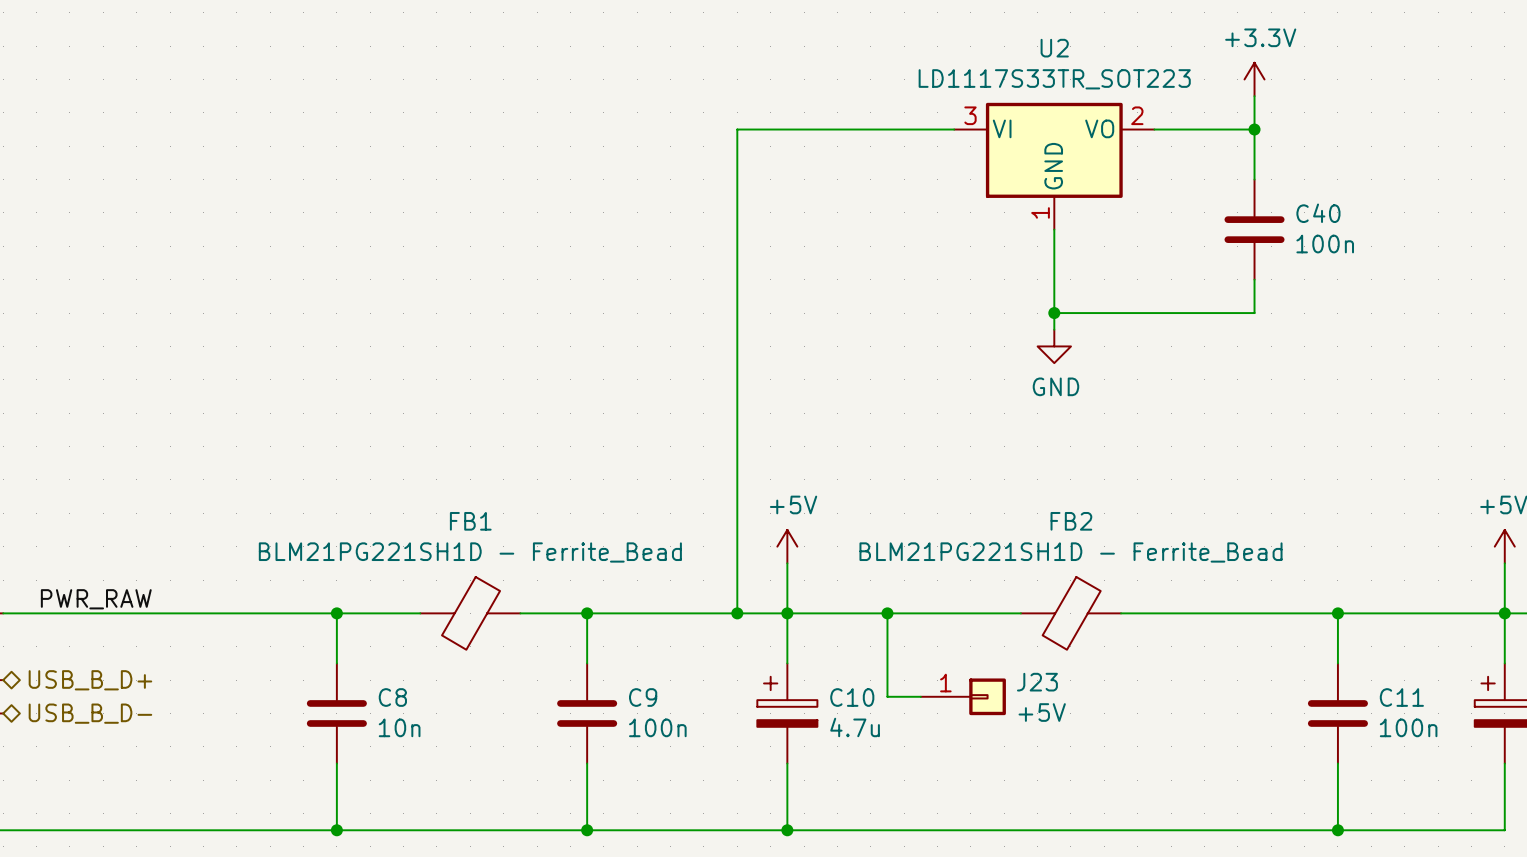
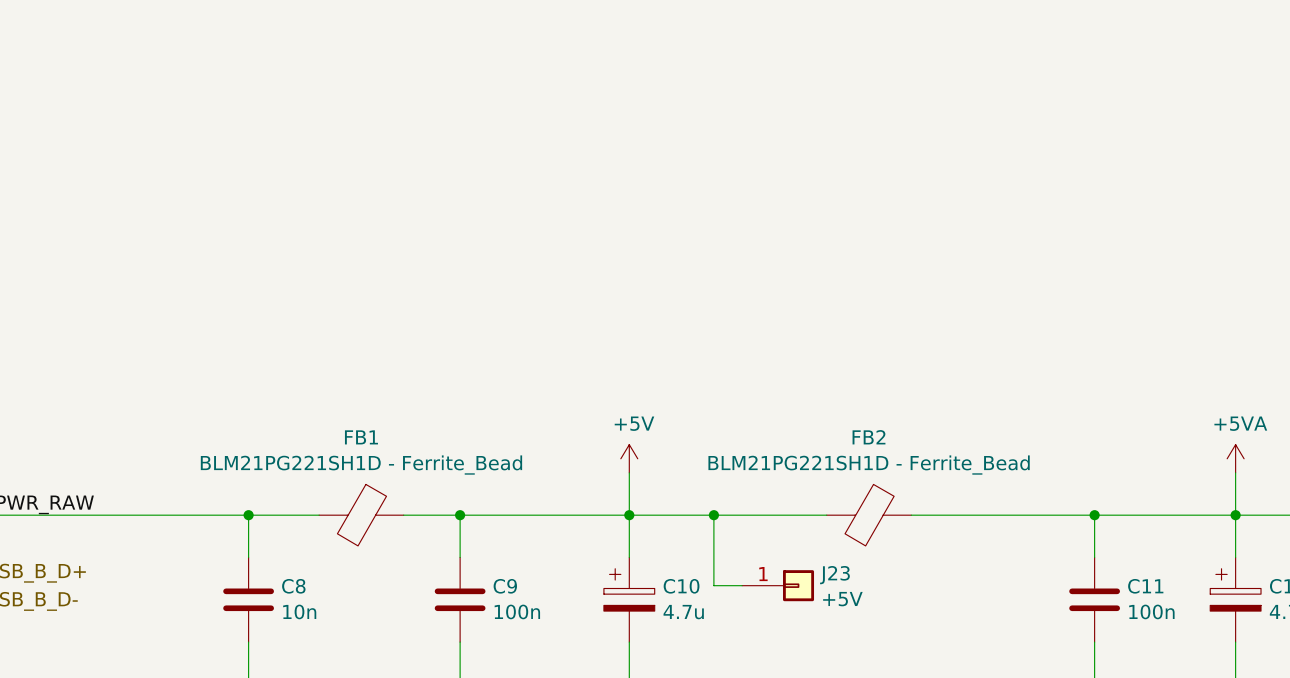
power symbol: +3.3V (1254, 79) -> none
wire: (1254, 96) (1254, 179) -> none
wire: (954, 129) (737, 129) (737, 613) -> none
wire: (1154, 129) (1254, 129) -> none
junction: (1254, 129) -> none
U2: LD1117S33TR_SOT223 (1054, 166) -> none
wire: (1054, 229) (1054, 329) -> none
C40: 100n (1254, 229) -> none
wire: (1254, 279) (1254, 313) (1054, 313) -> none
junction: (1054, 313) -> none
power symbol: GND (1054, 346) -> none
junction: (737, 613) -> none

